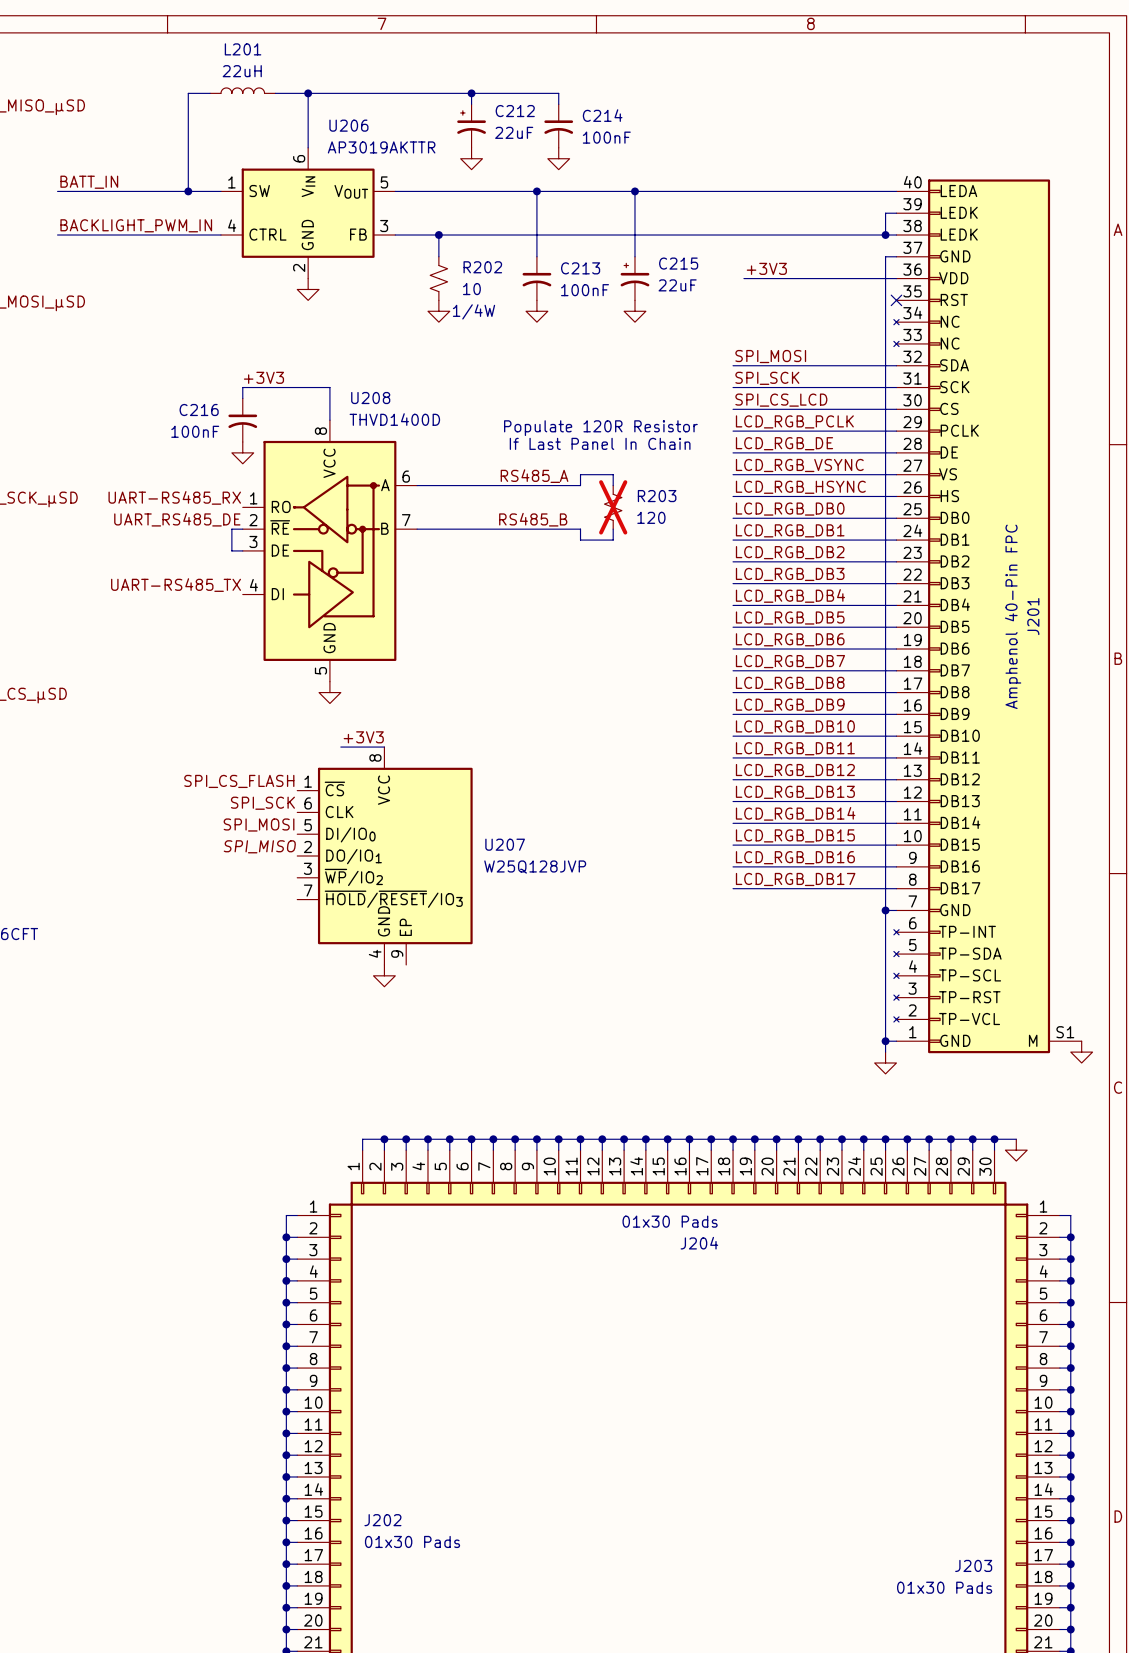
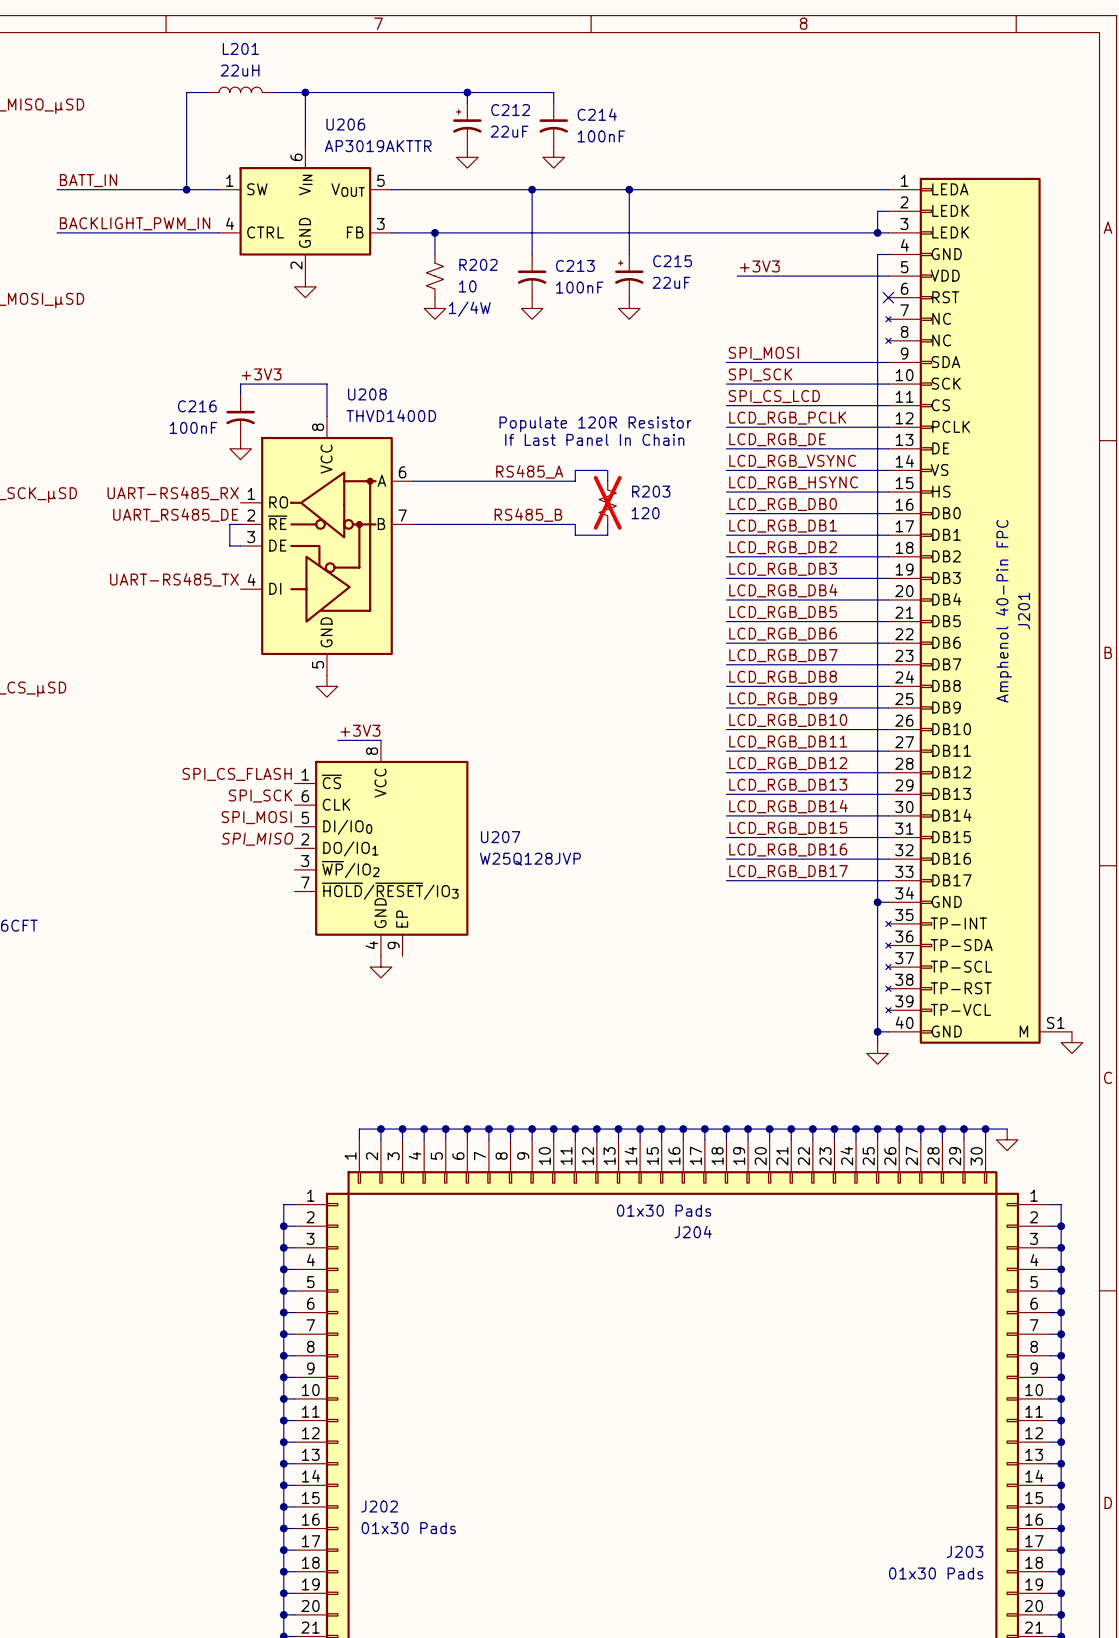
J201 symbol: [893, 179, 1082, 1054] -> [885, 177, 1072, 1044]

